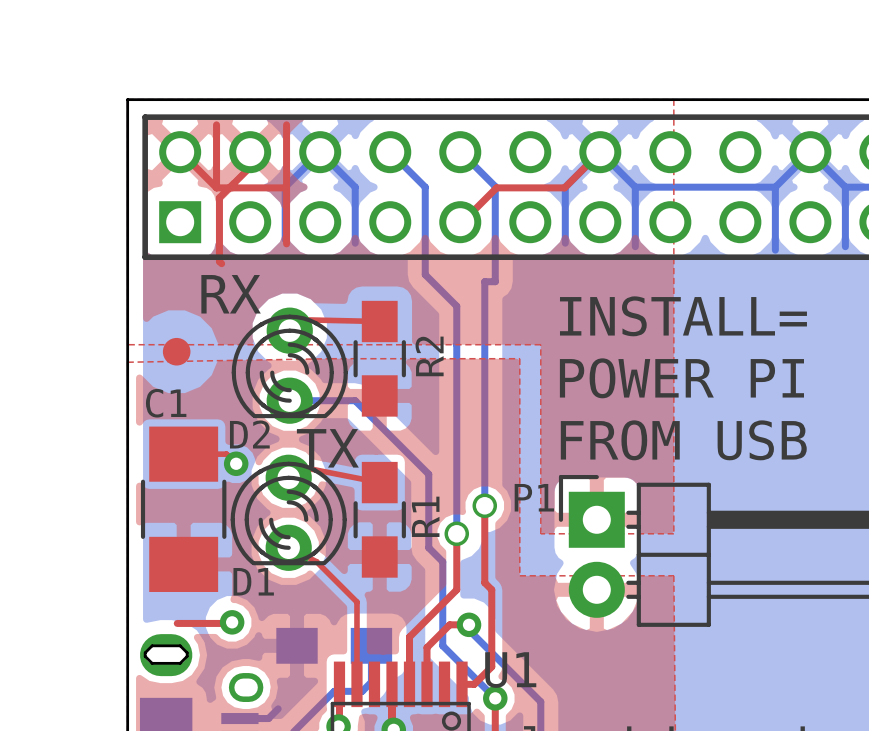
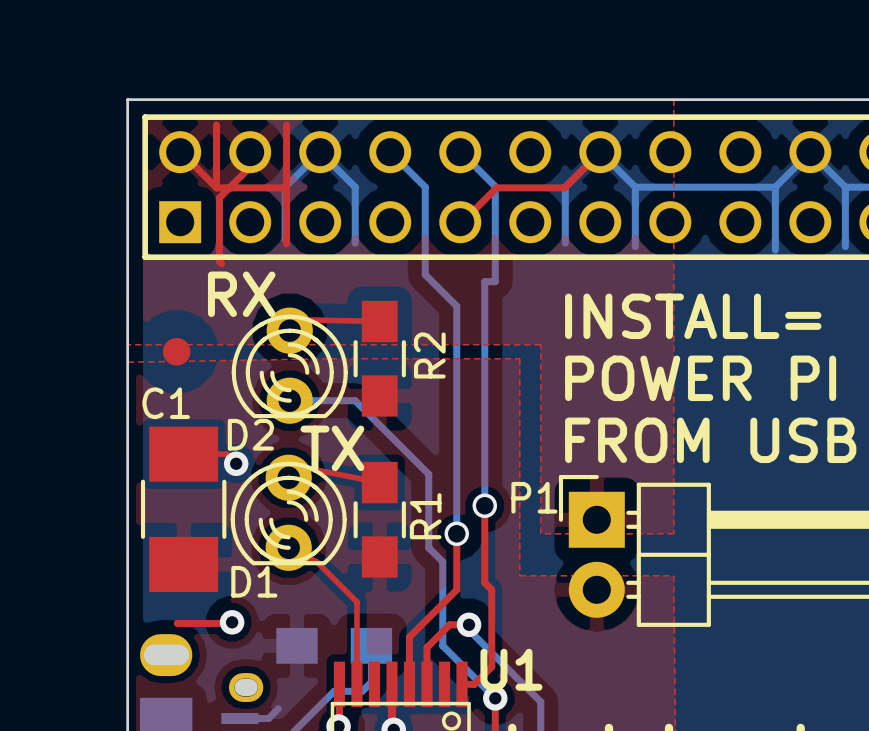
board edge: (152, 645) (145, 652) (145, 656) (152, 663) (180, 663) (187, 656) (187, 652) (180, 645) (152, 645) -> none
board edge: none -> (154, 654) (178, 654)
board edge: none -> (243, 687) (249, 687)

